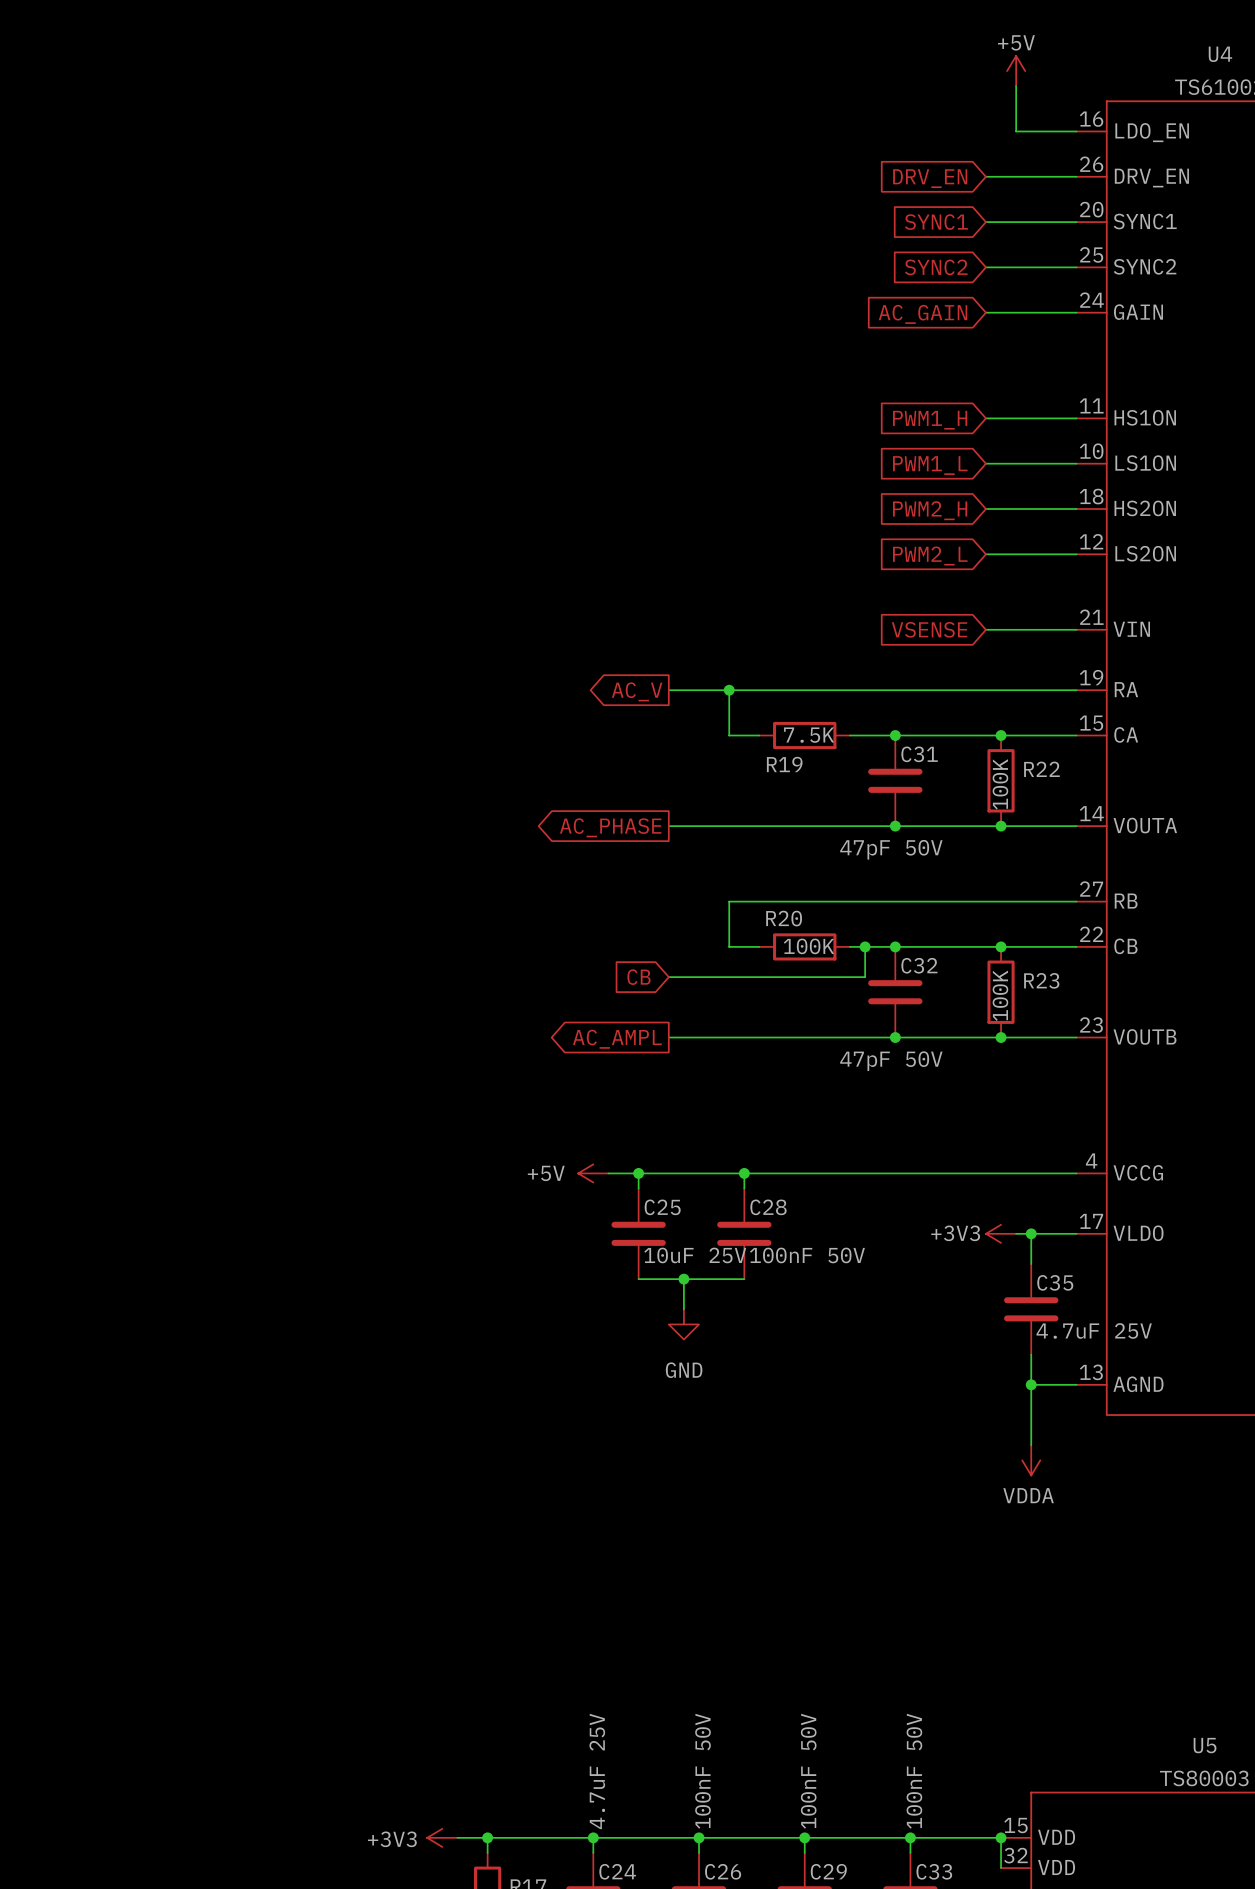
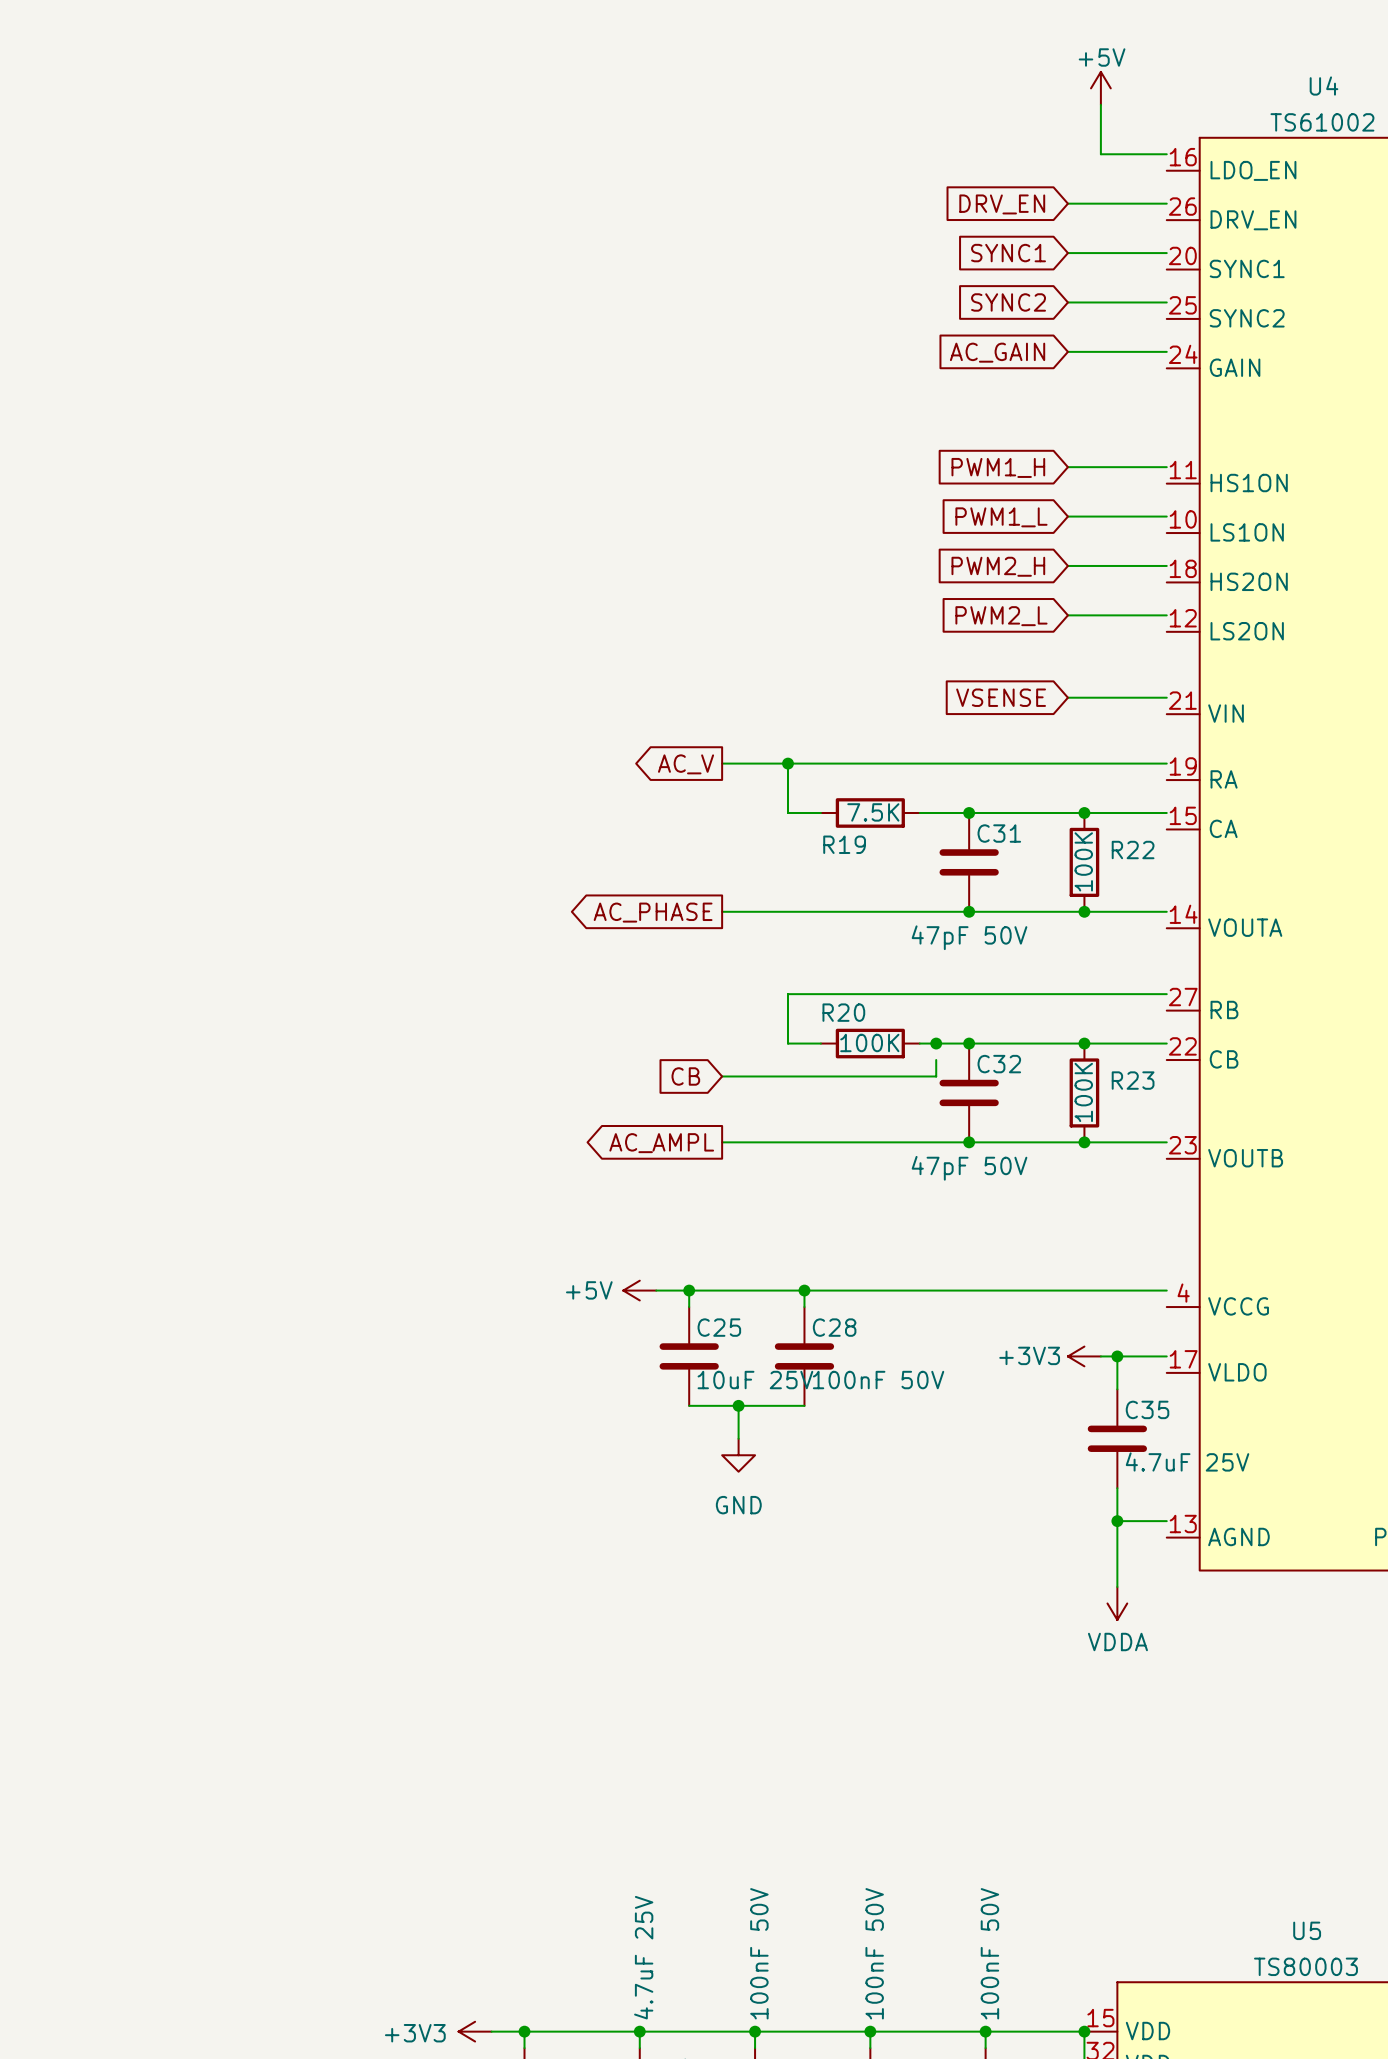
power symbol position: +5V (1016, 71) -> +5V (1100, 88)
wire: (1016, 116) (1016, 131) (1076, 131) -> (1100, 154) (1166, 154)
wire: (985, 176) (1076, 176) -> (1067, 203) (1166, 203)
global label position: DRV_EN (930, 178) -> DRV_EN (1002, 204)
global label position: SYNC1 (936, 222) -> SYNC1 (1008, 253)
wire: (985, 222) (1076, 222) -> (1067, 253) (1166, 253)
global label position: SYNC2 (936, 267) -> SYNC2 (1008, 302)
wire: (985, 267) (1076, 267) -> (1067, 302) (1166, 302)
wire: (985, 312) (1076, 312) -> (1067, 351) (1166, 351)
global label position: AC_GAIN (922, 314) -> AC_GAIN (997, 352)
wire: (985, 418) (1076, 418) -> (1067, 467) (1166, 467)
global label position: PWM1_H (930, 420) -> PWM1_H (998, 467)
wire: (985, 463) (1076, 463) -> (1067, 516) (1166, 516)
global label position: PWM1_L (930, 465) -> PWM1_L (1001, 517)
wire: (985, 508) (1076, 508) -> (1067, 565) (1166, 565)
global label position: PWM2_H (930, 510) -> PWM2_H (998, 566)
wire: (985, 554) (1076, 554) -> (1067, 615) (1166, 615)
global label position: PWM2_L (930, 556) -> PWM2_L (1001, 616)
global label position: VSENSE (929, 629) -> VSENSE (1001, 697)
wire: (985, 629) (1076, 629) -> (1067, 697) (1166, 697)
wire: none -> (788, 763) (788, 780)
wire: (668, 690) (1076, 690) -> (722, 763) (1166, 763)
junction position: (729, 690) -> (788, 763)
global label position: AC_V (637, 691) -> AC_V (686, 764)
wire: (729, 720) (729, 735) (759, 735) -> (788, 812) (820, 812)
R19 position: (804, 735) -> (870, 812)
wire: (850, 735) (1076, 735) -> (919, 812) (1166, 812)
junction position: (895, 735) -> (969, 812)
junction position: (1001, 735) -> (1084, 812)
C31 position: (895, 780) -> (969, 862)
R22 position: (1001, 780) -> (1084, 862)
wire: (668, 826) (1076, 826) -> (722, 911) (1166, 911)
junction position: (895, 826) -> (969, 911)
junction position: (1001, 826) -> (1084, 911)
global label position: AC_PHASE (610, 827) -> AC_PHASE (653, 912)
wire: (729, 901) (1076, 901) -> (788, 1010) (788, 994) (1166, 994)
wire: (729, 931) (729, 946) (759, 946) -> (788, 1043) (820, 1043)
R20 position: (804, 946) -> (870, 1043)
wire: (850, 946) (1076, 946) -> (919, 1043) (1166, 1043)
junction position: (865, 946) -> (936, 1043)
junction position: (895, 946) -> (969, 1043)
junction position: (1001, 946) -> (1084, 1043)
wire: (865, 962) (865, 977) (668, 977) -> (936, 1076) (722, 1076)
global label position: CB (638, 977) -> CB (685, 1076)
C32 position: (895, 992) -> (969, 1092)
R23 position: (1001, 992) -> (1084, 1092)
wire: (668, 1037) (1076, 1037) -> (722, 1142) (1166, 1142)
junction position: (895, 1037) -> (969, 1142)
junction position: (1001, 1037) -> (1084, 1142)
global label position: AC_AMPL (617, 1039) -> AC_AMPL (661, 1143)
power symbol position: +5V (593, 1173) -> +5V (639, 1290)
wire: (608, 1173) (1076, 1173) -> (656, 1290) (1166, 1290)
junction position: (638, 1173) -> (689, 1290)
junction position: (744, 1173) -> (804, 1290)
C25 position: (638, 1233) -> (689, 1356)
C28 position: (744, 1233) -> (804, 1356)
power symbol position: +3V3 (1001, 1233) -> +3V3 (1084, 1356)
wire: (1016, 1233) (1076, 1233) -> (1100, 1356) (1166, 1356)
junction position: (1031, 1233) -> (1117, 1356)
wire: (638, 1279) (744, 1279) -> (689, 1405) (804, 1405)
junction position: (683, 1279) -> (738, 1405)
C35 position: (1031, 1309) -> (1117, 1438)
power symbol position: GND (683, 1324) -> GND (738, 1455)
wire: (1031, 1384) (1076, 1384) -> (1117, 1521) (1166, 1521)
junction position: (1031, 1384) -> (1117, 1521)
power symbol position: VDDA (1031, 1460) -> VDDA (1117, 1603)

